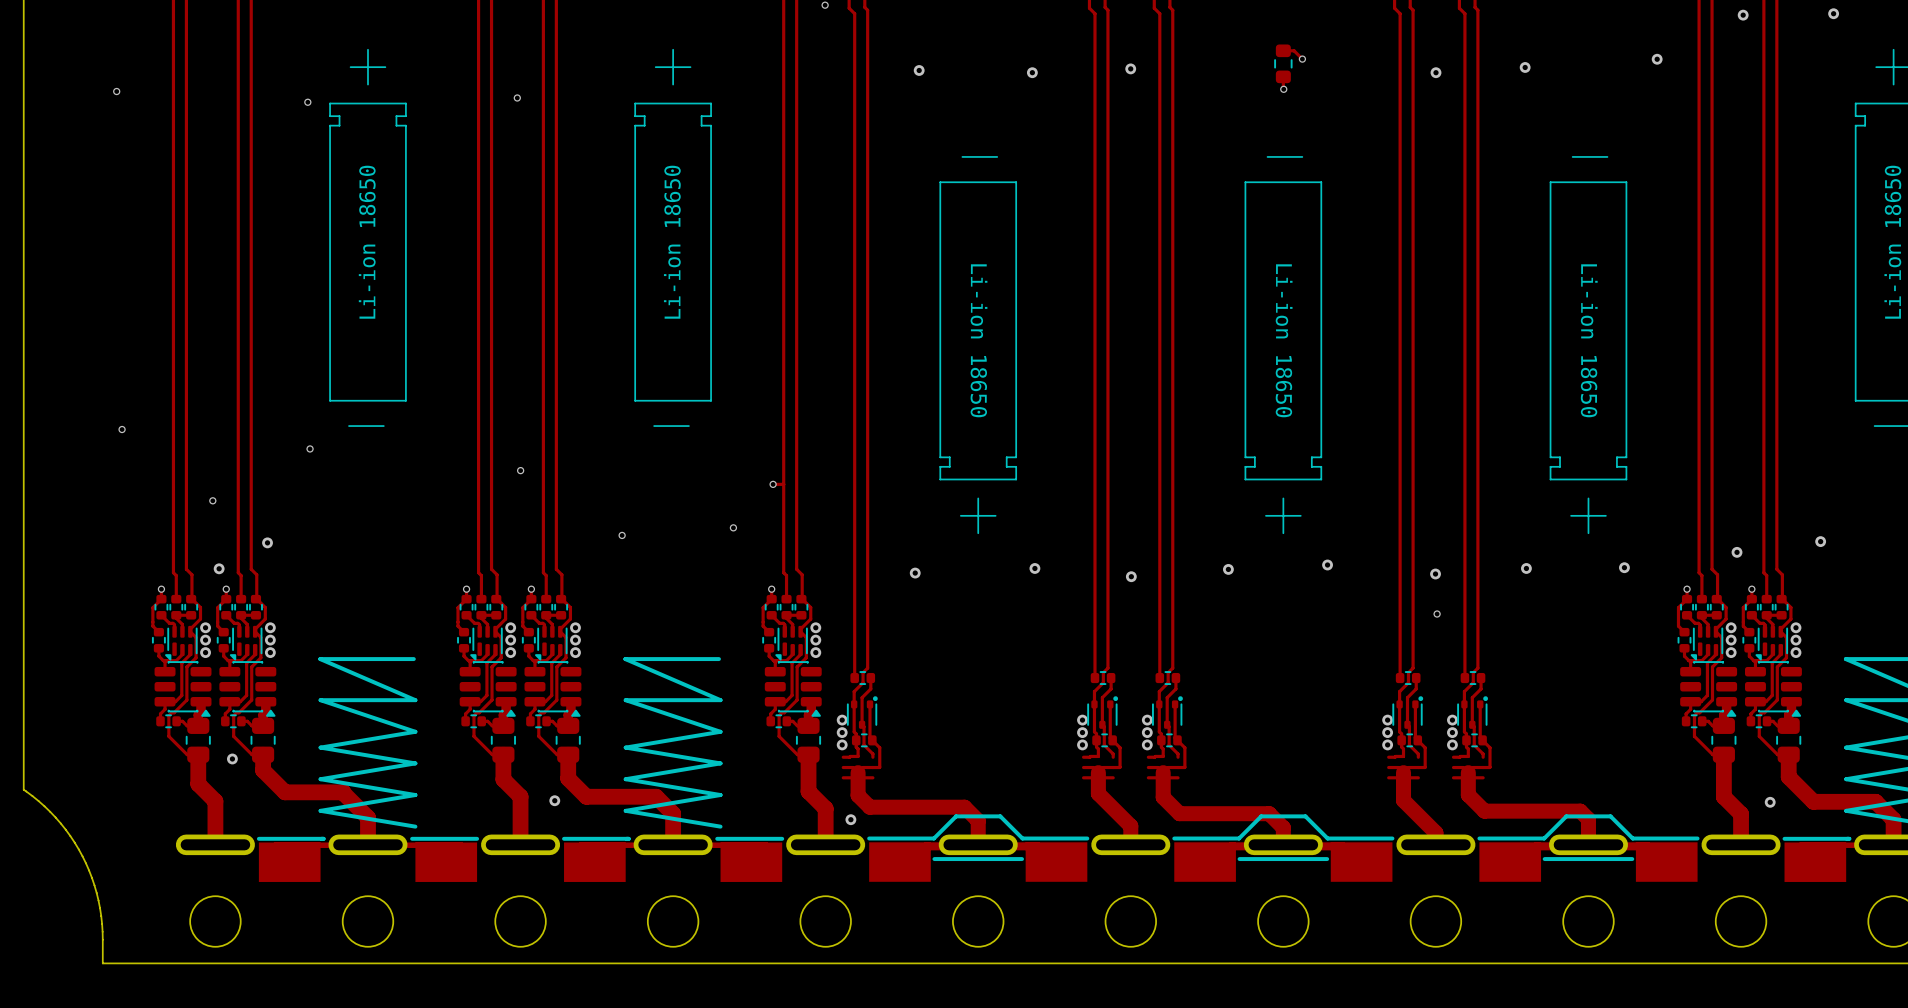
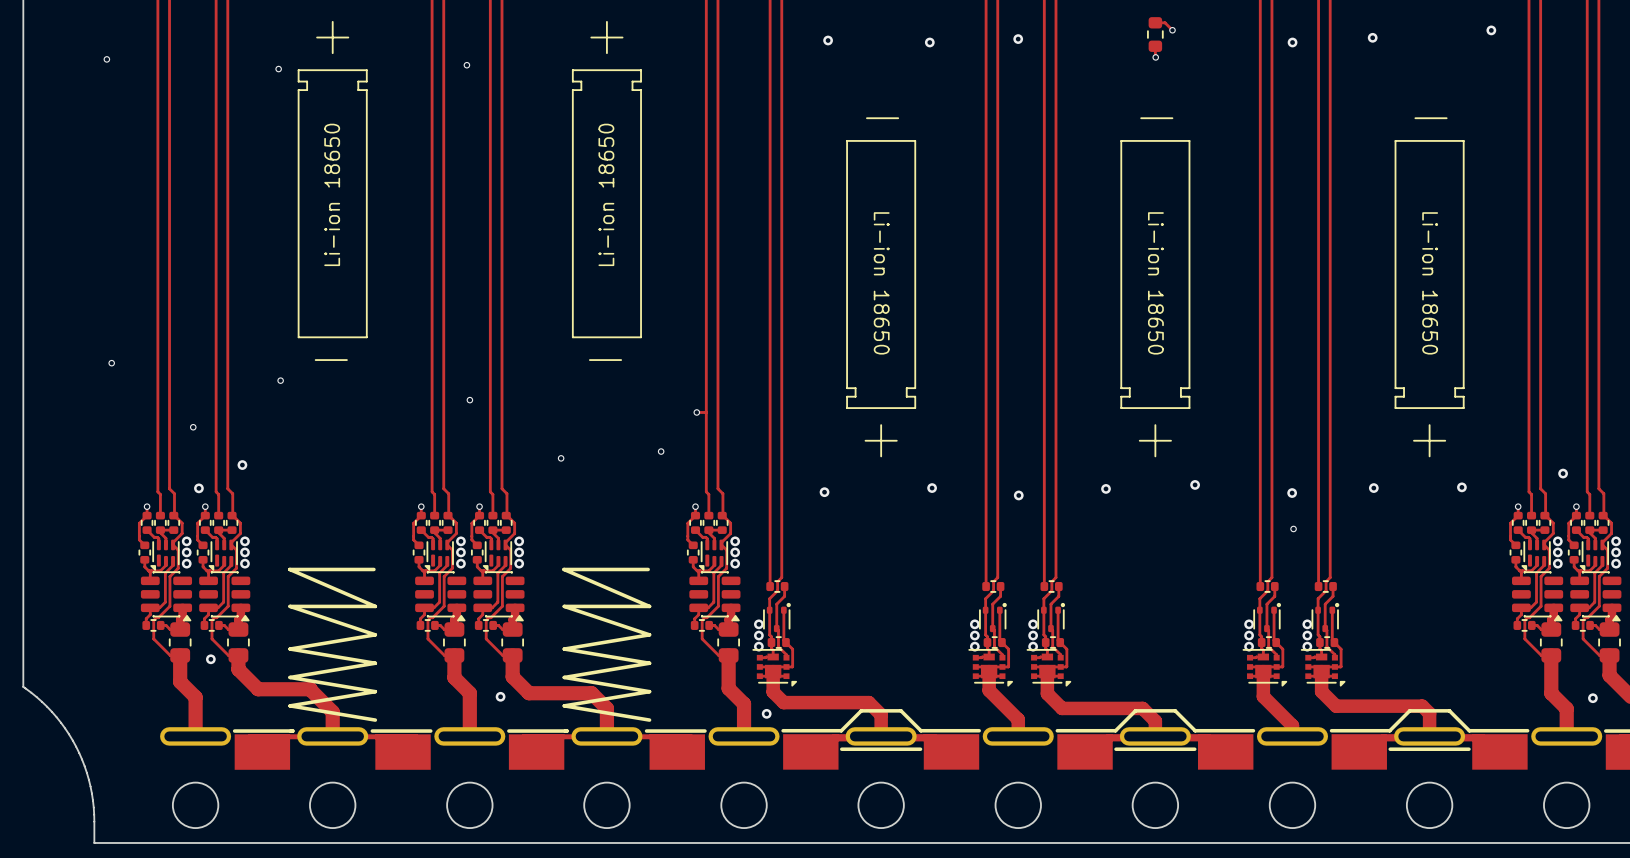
part: none -> (774, 667)
part: none -> (990, 667)
part: none -> (1048, 667)
part: none -> (1264, 667)
part: none -> (1323, 667)

